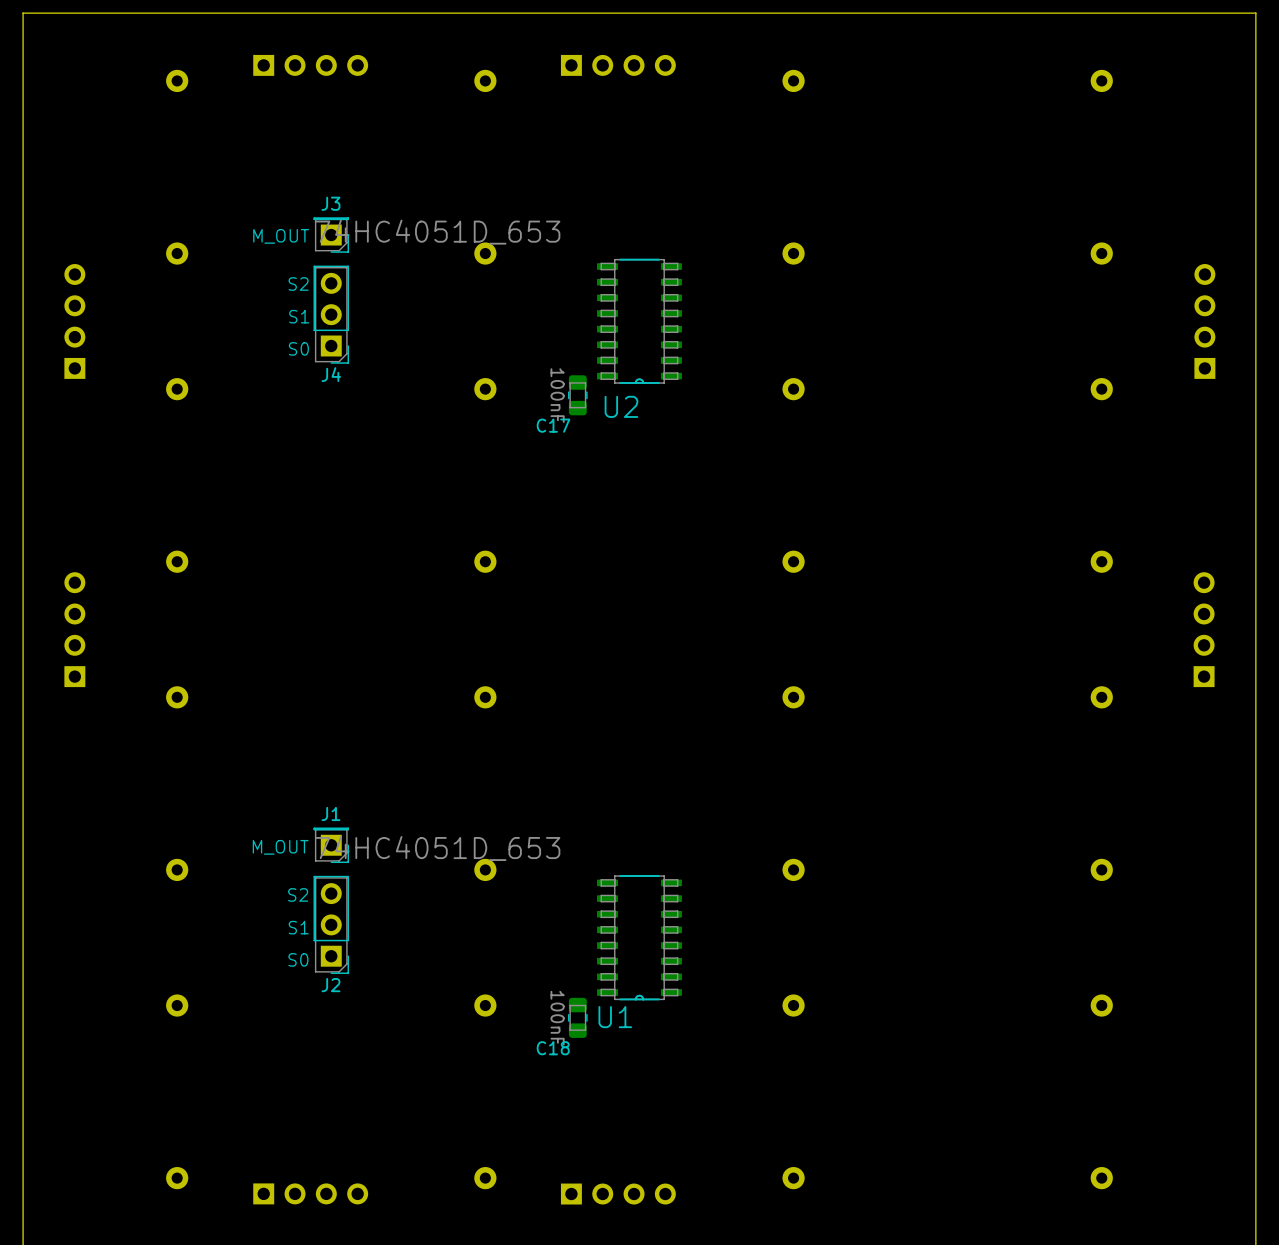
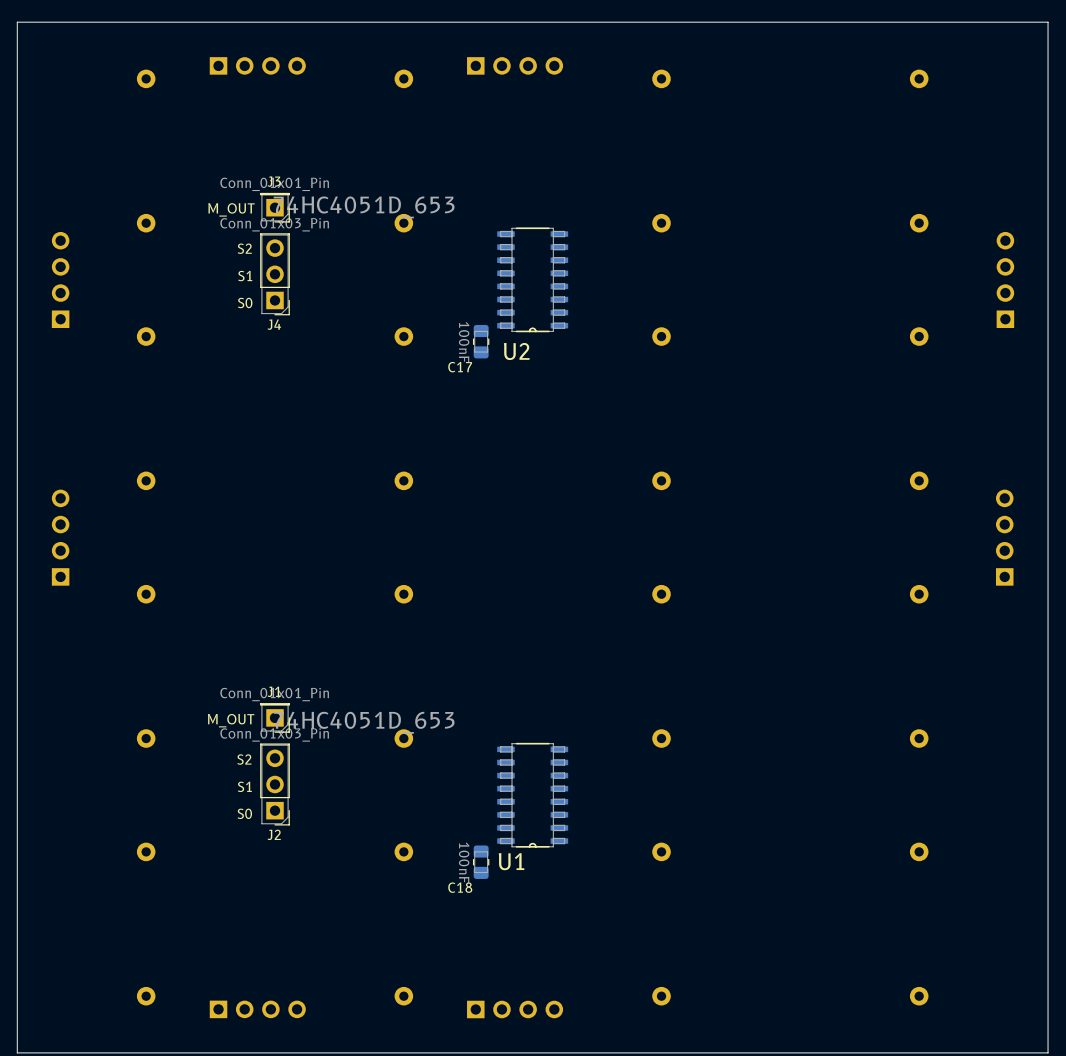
J3 value: none -> Conn_01x01_Pin (274, 184)
J4 value: none -> Conn_01x03_Pin (274, 224)
J1 value: none -> Conn_01x01_Pin (274, 694)
J2 value: none -> Conn_01x03_Pin (274, 734)

